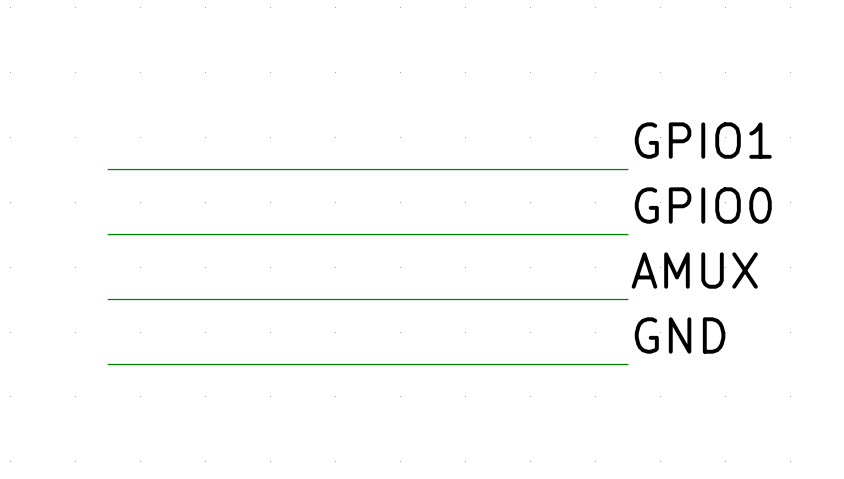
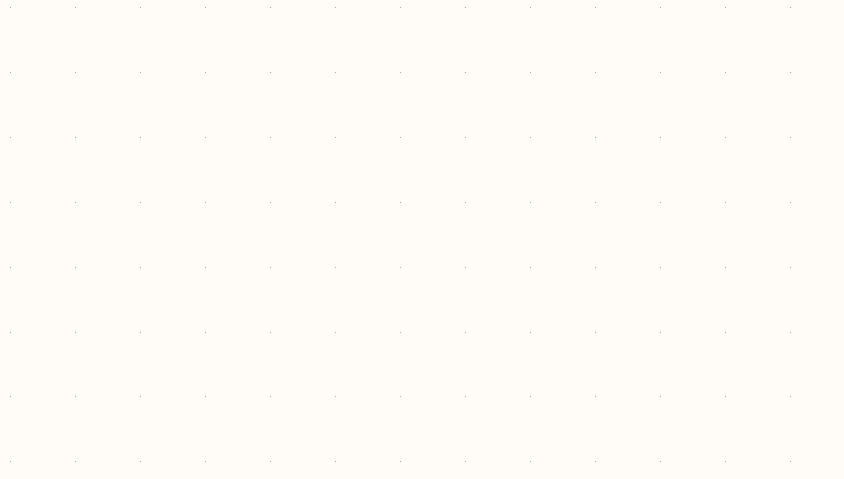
label: GPIO1 (703, 140) -> none
wire: (108, 169) (627, 169) -> none
label: GPIO0 (703, 205) -> none
wire: (108, 234) (627, 234) -> none
label: AMUX (694, 270) -> none
wire: (108, 299) (627, 299) -> none
label: GND (680, 335) -> none
wire: (108, 364) (627, 364) -> none

